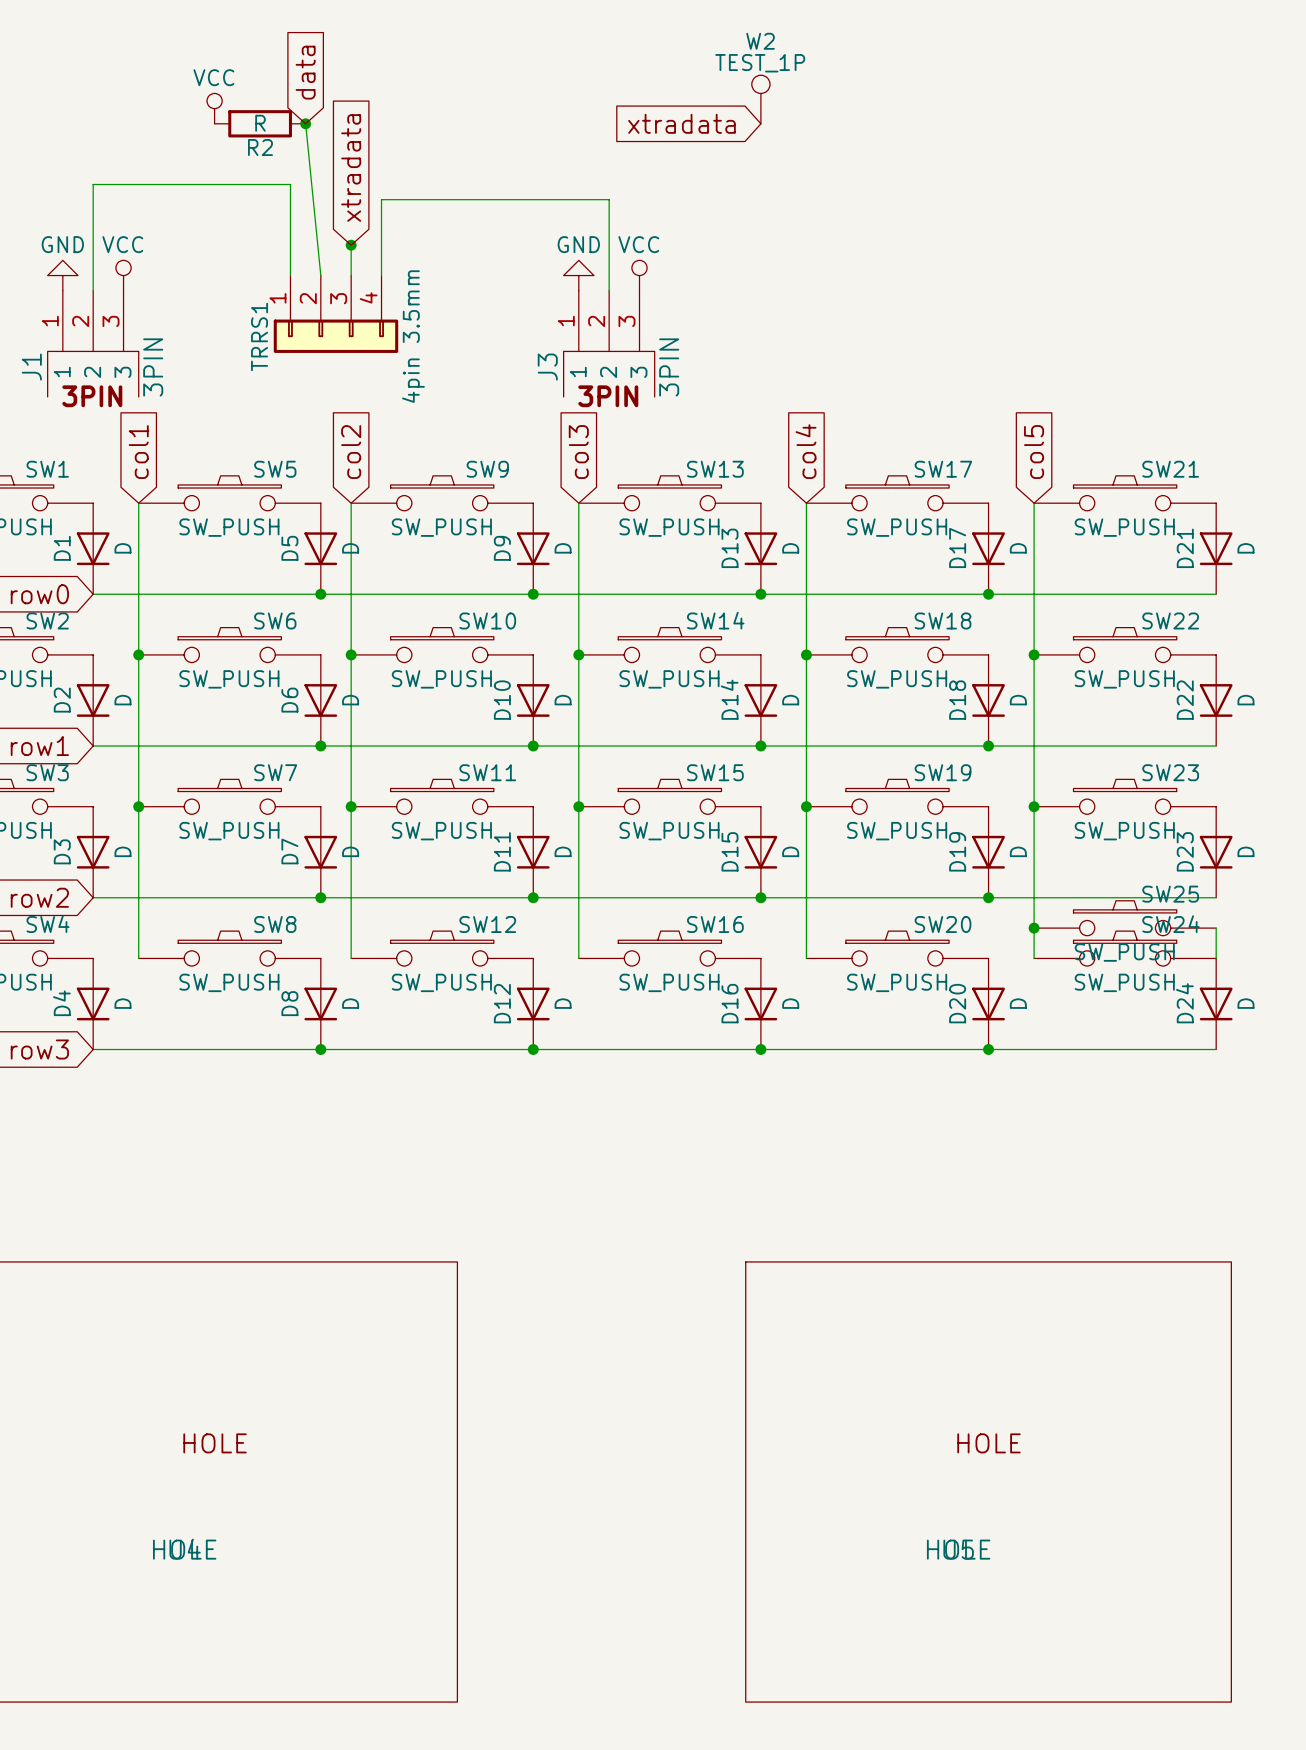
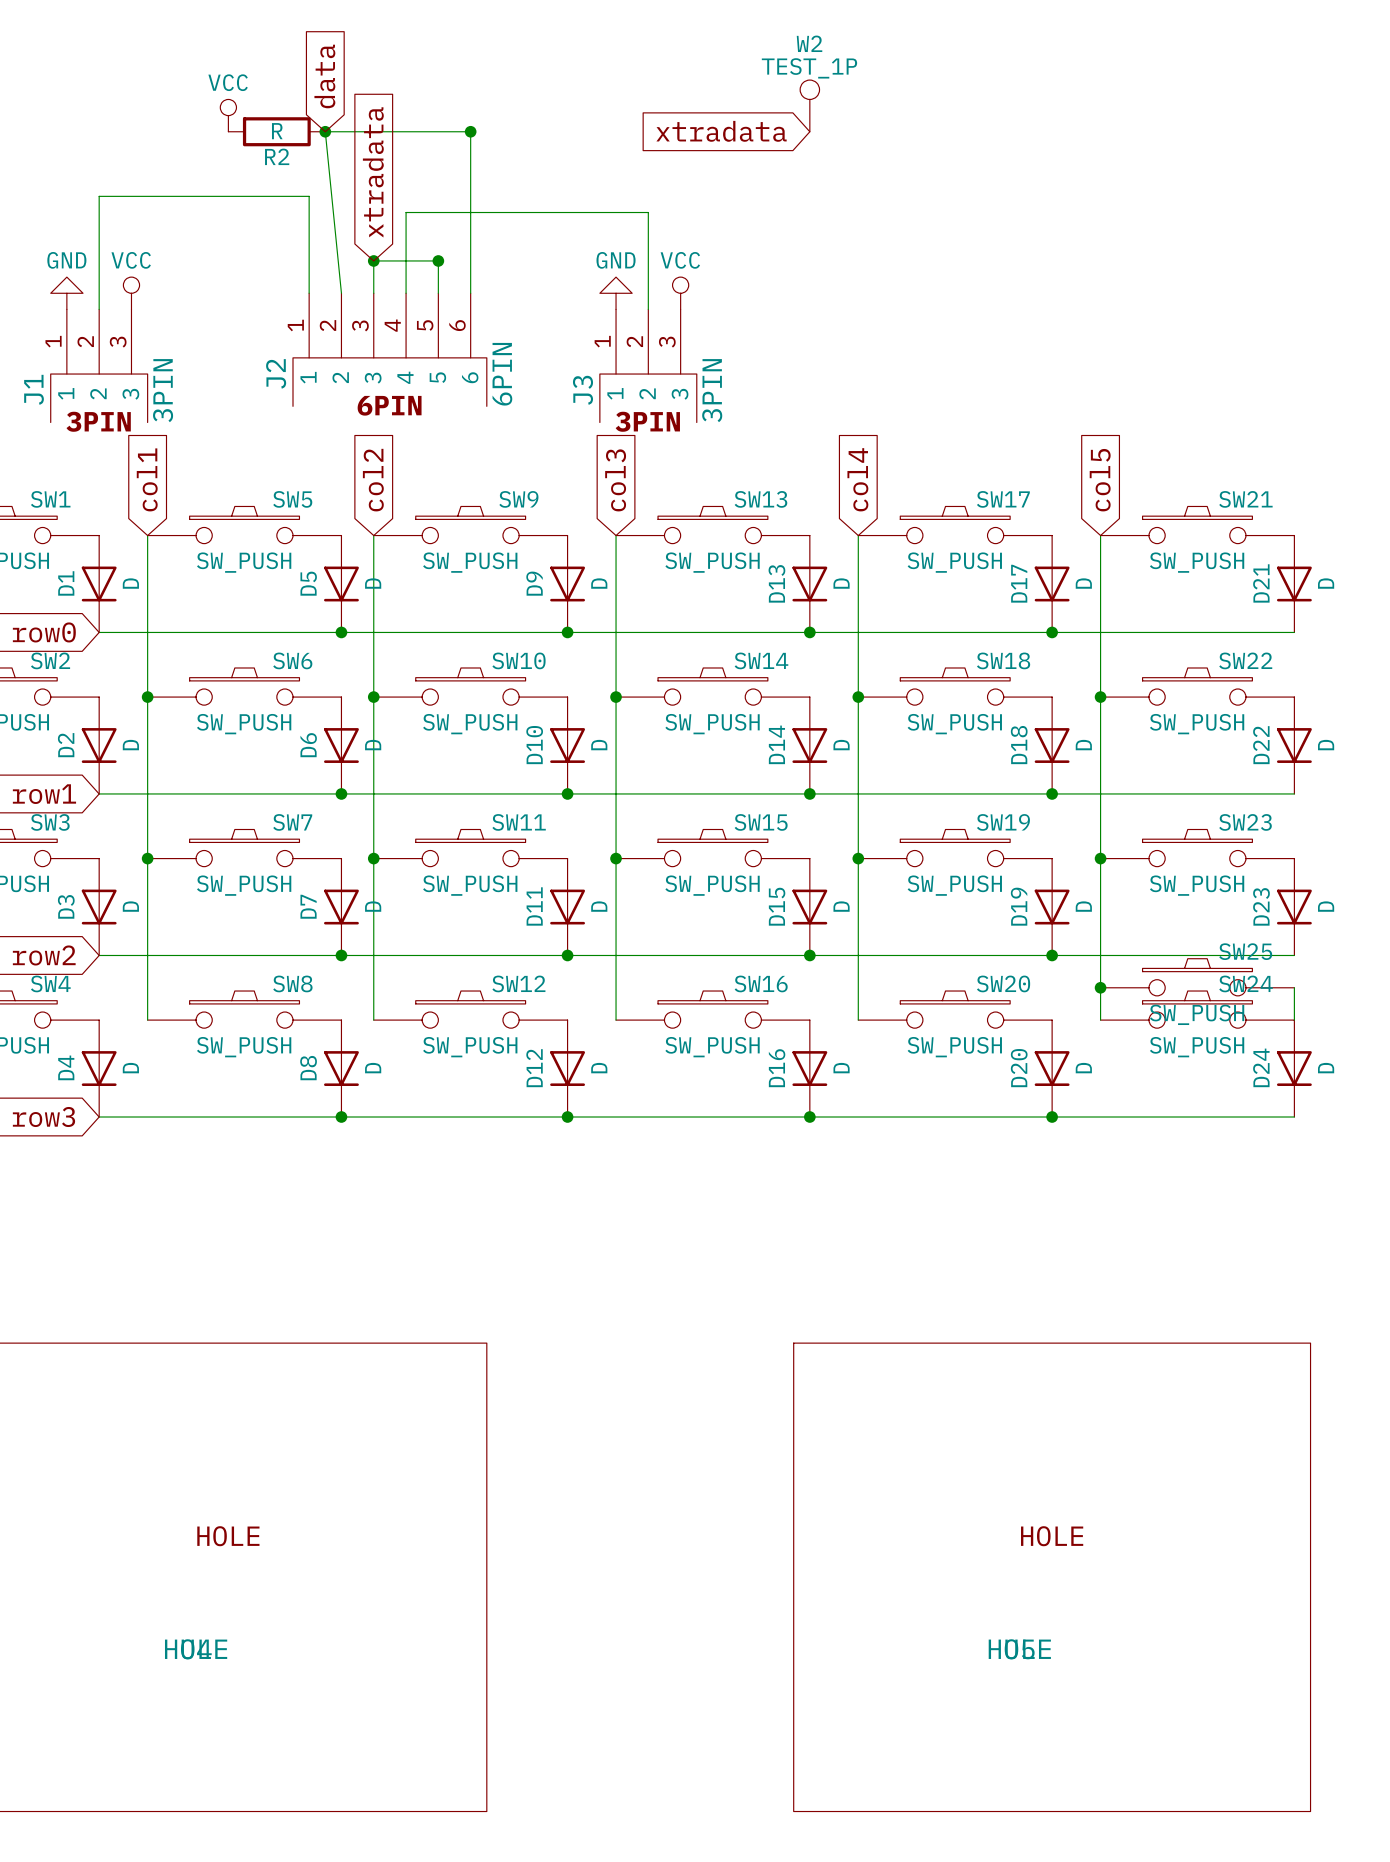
wire: none -> (325, 131) (470, 131) (470, 293)
junction: none -> (470, 131)
wire: none -> (373, 260) (438, 260) (438, 293)
junction: none -> (438, 260)
TRRS1: 4pin 3.5mm (335, 314) -> none
J2: none -> 6PIN (389, 349)

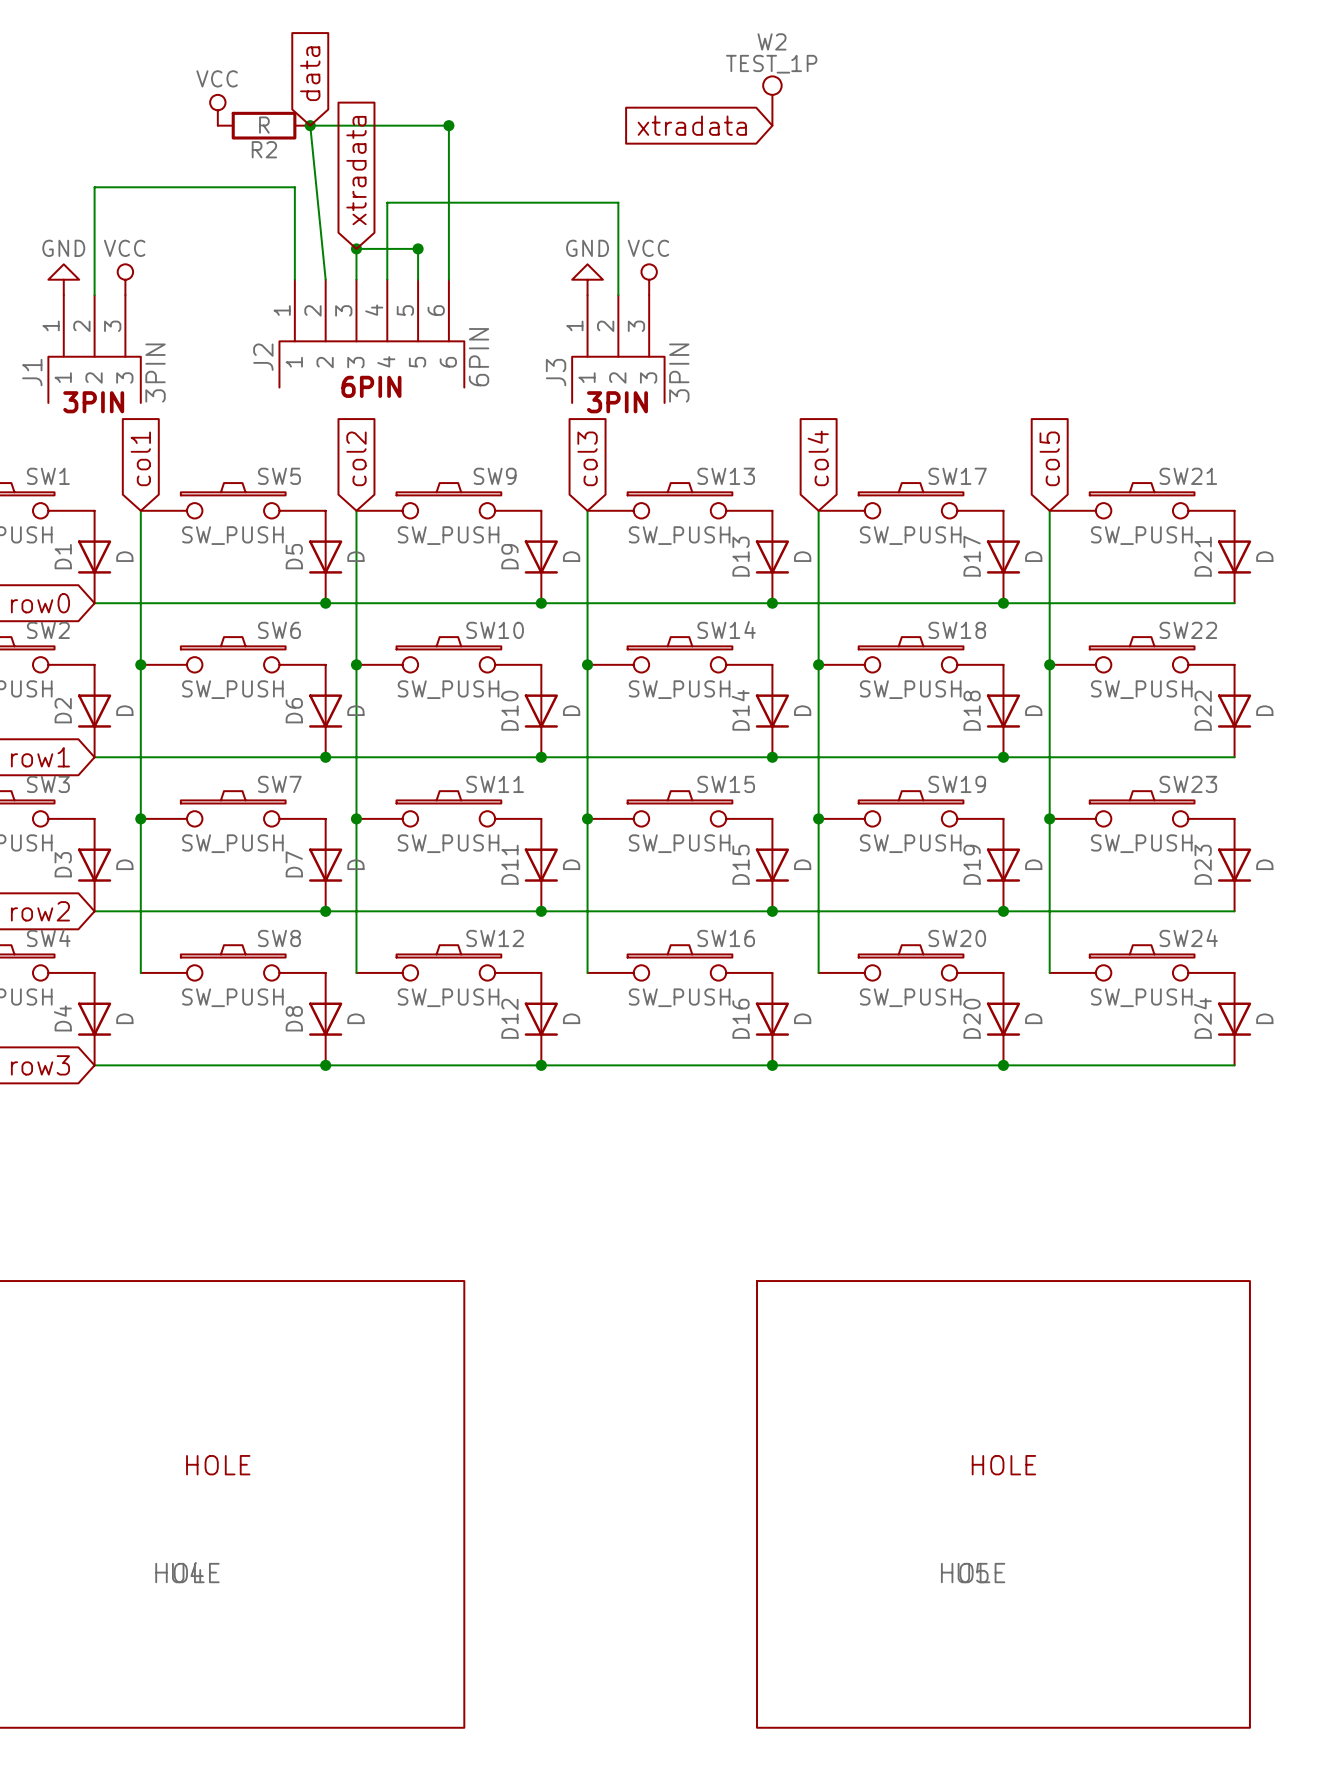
SW25: SW_PUSH (1197, 977) -> none
junction: (1100, 987) -> none
wire: (1294, 987) (1294, 1020) -> none

